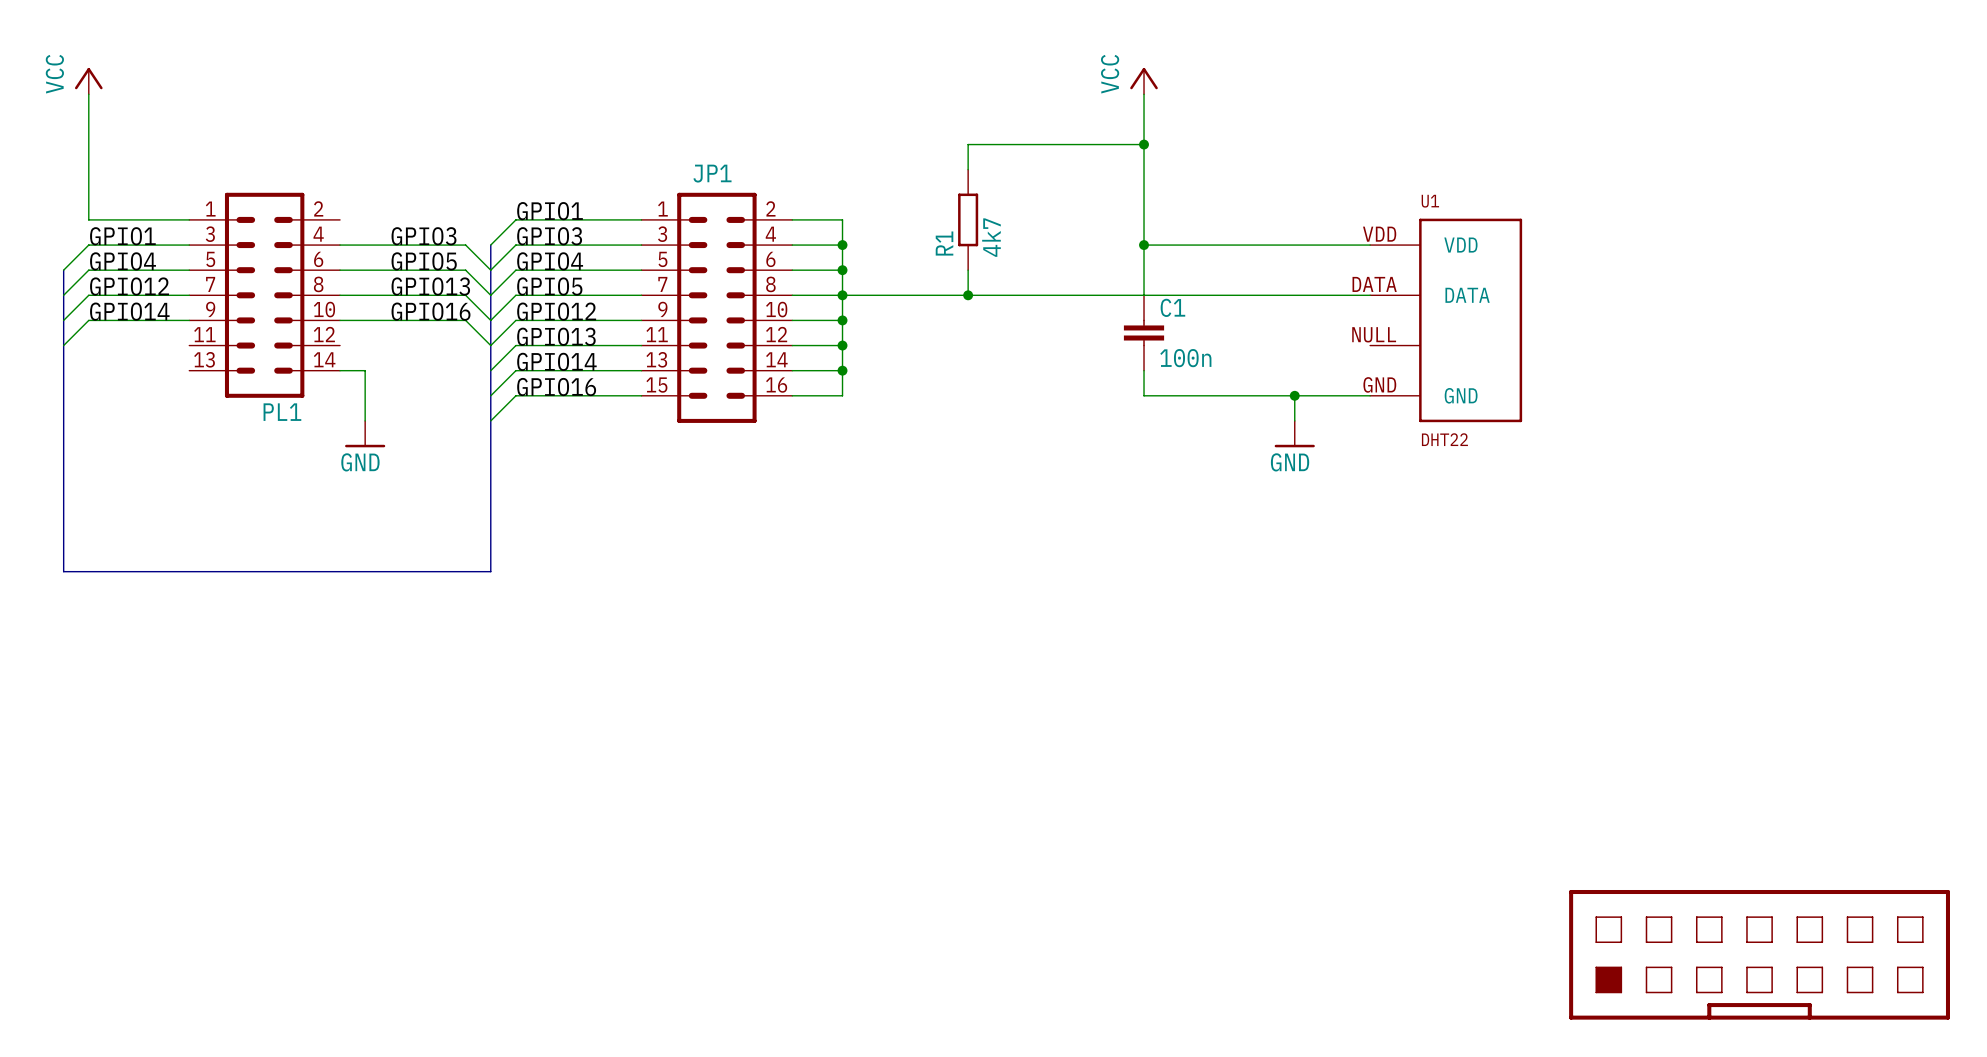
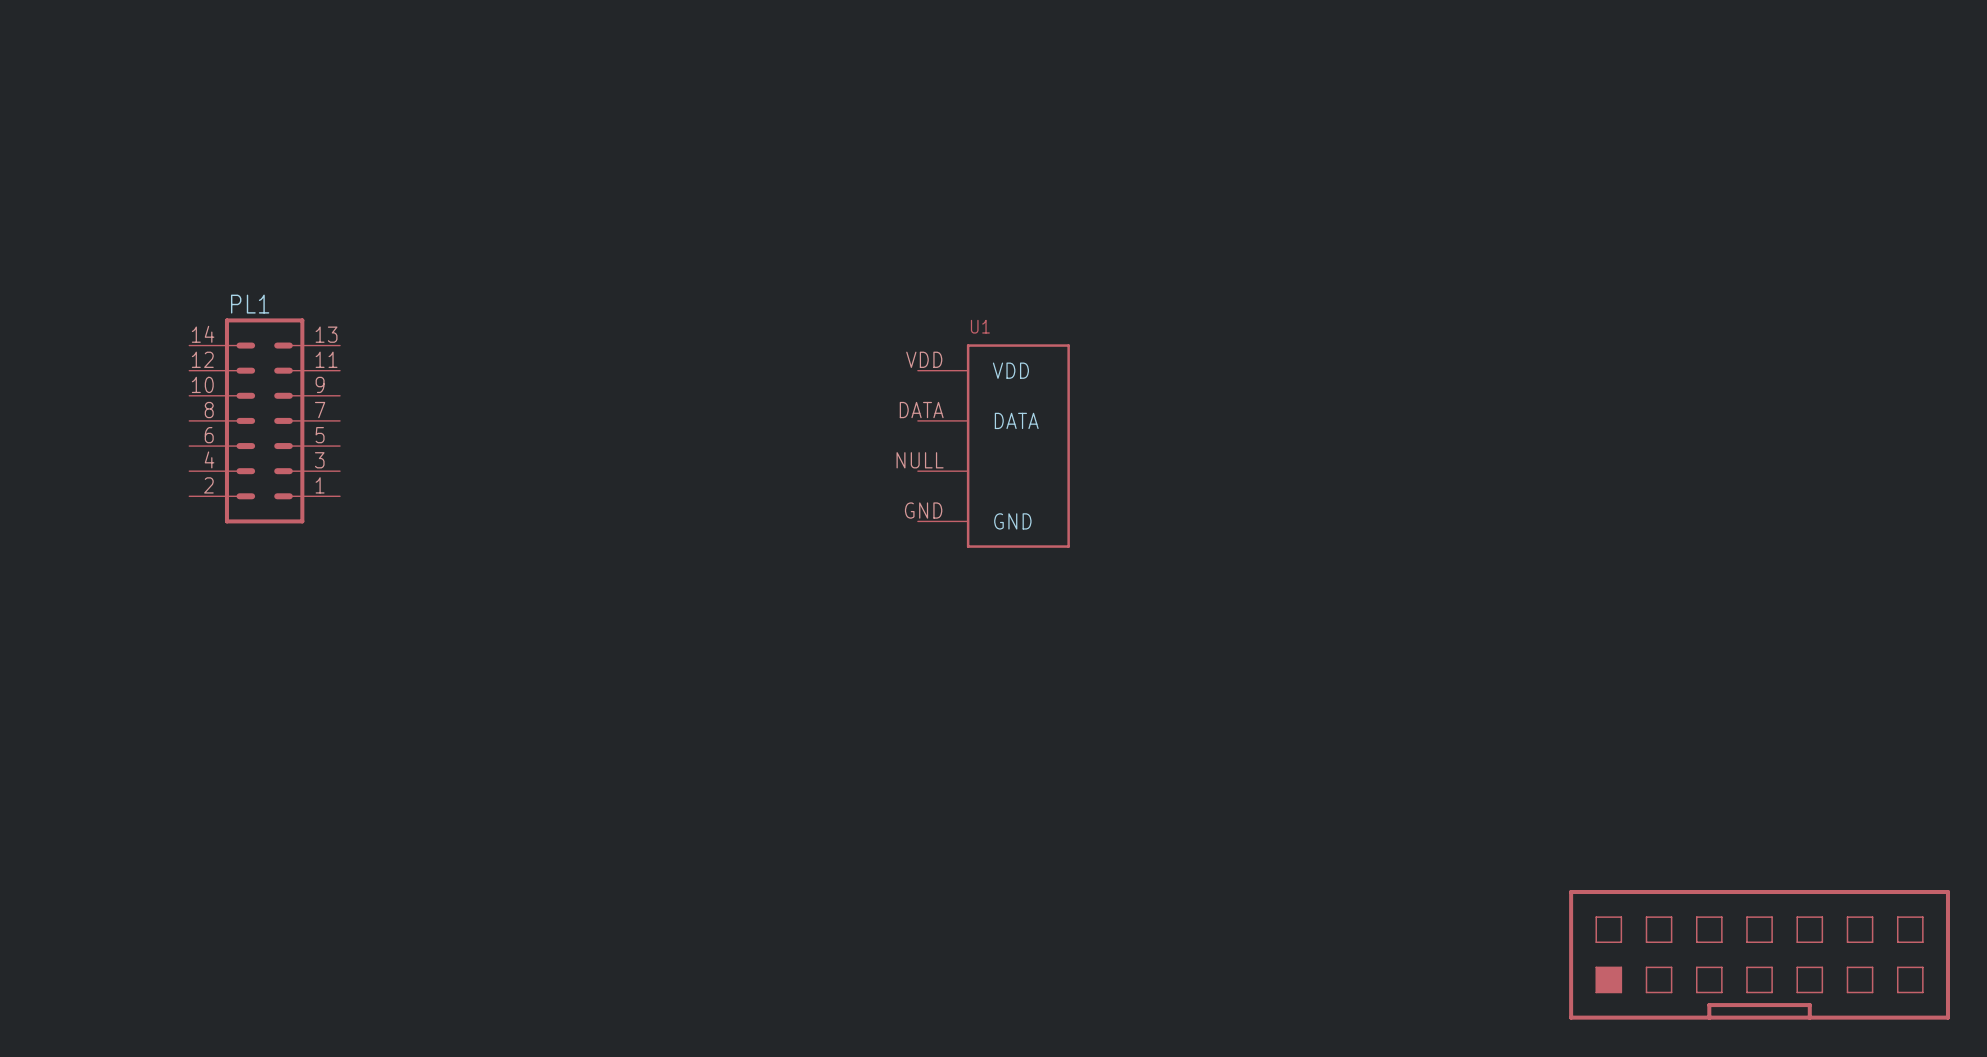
power symbol: VCC (88, 81) -> none
power symbol: VCC (1144, 81) -> none
wire: (88, 94) (88, 219) (189, 219) -> none
wire: (1144, 94) (1144, 295) -> none
wire: (1144, 144) (968, 144) (968, 169) -> none
junction: (1144, 144) -> none
label: GPIO1 (550, 211) -> none
wire: (641, 219) (515, 219) (490, 245) -> none
wire: (792, 219) (842, 219) (842, 395) (792, 395) -> none
R1: 4k7 (968, 219) -> none
label: GPIO1 (122, 236) -> none
label: GPIO3 (424, 236) -> none
label: GPIO3 (549, 236) -> none
wire: (189, 245) (88, 245) (63, 270) -> none
wire: (340, 245) (465, 245) (490, 270) (515, 245) (641, 245) -> none
bus: (490, 245) (490, 571) (63, 571) (63, 270) -> none
wire: (792, 245) (842, 245) -> none
junction: (842, 245) -> none
wire: (1144, 245) (1370, 245) -> none
junction: (1144, 245) -> none
label: GPIO4 (123, 261) -> none
label: GPIO5 (424, 261) -> none
label: GPIO4 (550, 261) -> none
wire: (189, 270) (88, 270) (63, 295) -> none
wire: (340, 270) (465, 270) (490, 295) (515, 270) (641, 270) -> none
wire: (792, 270) (842, 270) -> none
junction: (842, 270) -> none
wire: (968, 270) (968, 295) -> none
label: GPIO12 (129, 286) -> none
label: GPIO13 (430, 286) -> none
label: GPIO5 (549, 286) -> none
wire: (189, 295) (88, 295) (63, 320) -> none
PL1 rotation: 0° (264, 295) -> 180° (264, 420)
PL1 position: (264, 295) -> (264, 420)
wire: (340, 295) (465, 295) (490, 320) (515, 295) (641, 295) -> none
wire: (792, 295) (1370, 295) -> none
junction: (842, 295) -> none
junction: (968, 295) -> none
JP1: (716, 307) -> none
label: GPIO14 (129, 311) -> none
label: GPIO16 (431, 311) -> none
label: GPIO12 (556, 311) -> none
wire: (189, 320) (88, 320) (63, 345) -> none
wire: (340, 320) (465, 320) (490, 345) (515, 320) (641, 320) -> none
wire: (792, 320) (842, 320) -> none
junction: (842, 320) -> none
U1 position: (1446, 320) -> (993, 446)
C1: 100n (1144, 332) -> none
label: GPIO13 (556, 336) -> none
wire: (641, 345) (515, 345) (490, 370) -> none
wire: (792, 345) (842, 345) -> none
junction: (842, 345) -> none
label: GPIO14 (556, 361) -> none
wire: (340, 370) (365, 370) (365, 420) -> none
wire: (641, 370) (515, 370) (490, 395) -> none
wire: (792, 370) (842, 370) -> none
junction: (842, 370) -> none
wire: (1144, 370) (1144, 395) (1370, 395) -> none
label: GPIO16 (556, 387) -> none
wire: (641, 395) (515, 395) (490, 420) -> none
wire: (1294, 395) (1294, 420) -> none
junction: (1294, 395) -> none
power symbol: GND (365, 434) -> none
power symbol: GND (1294, 434) -> none
U1 value: DHT22 (1444, 439) -> none

